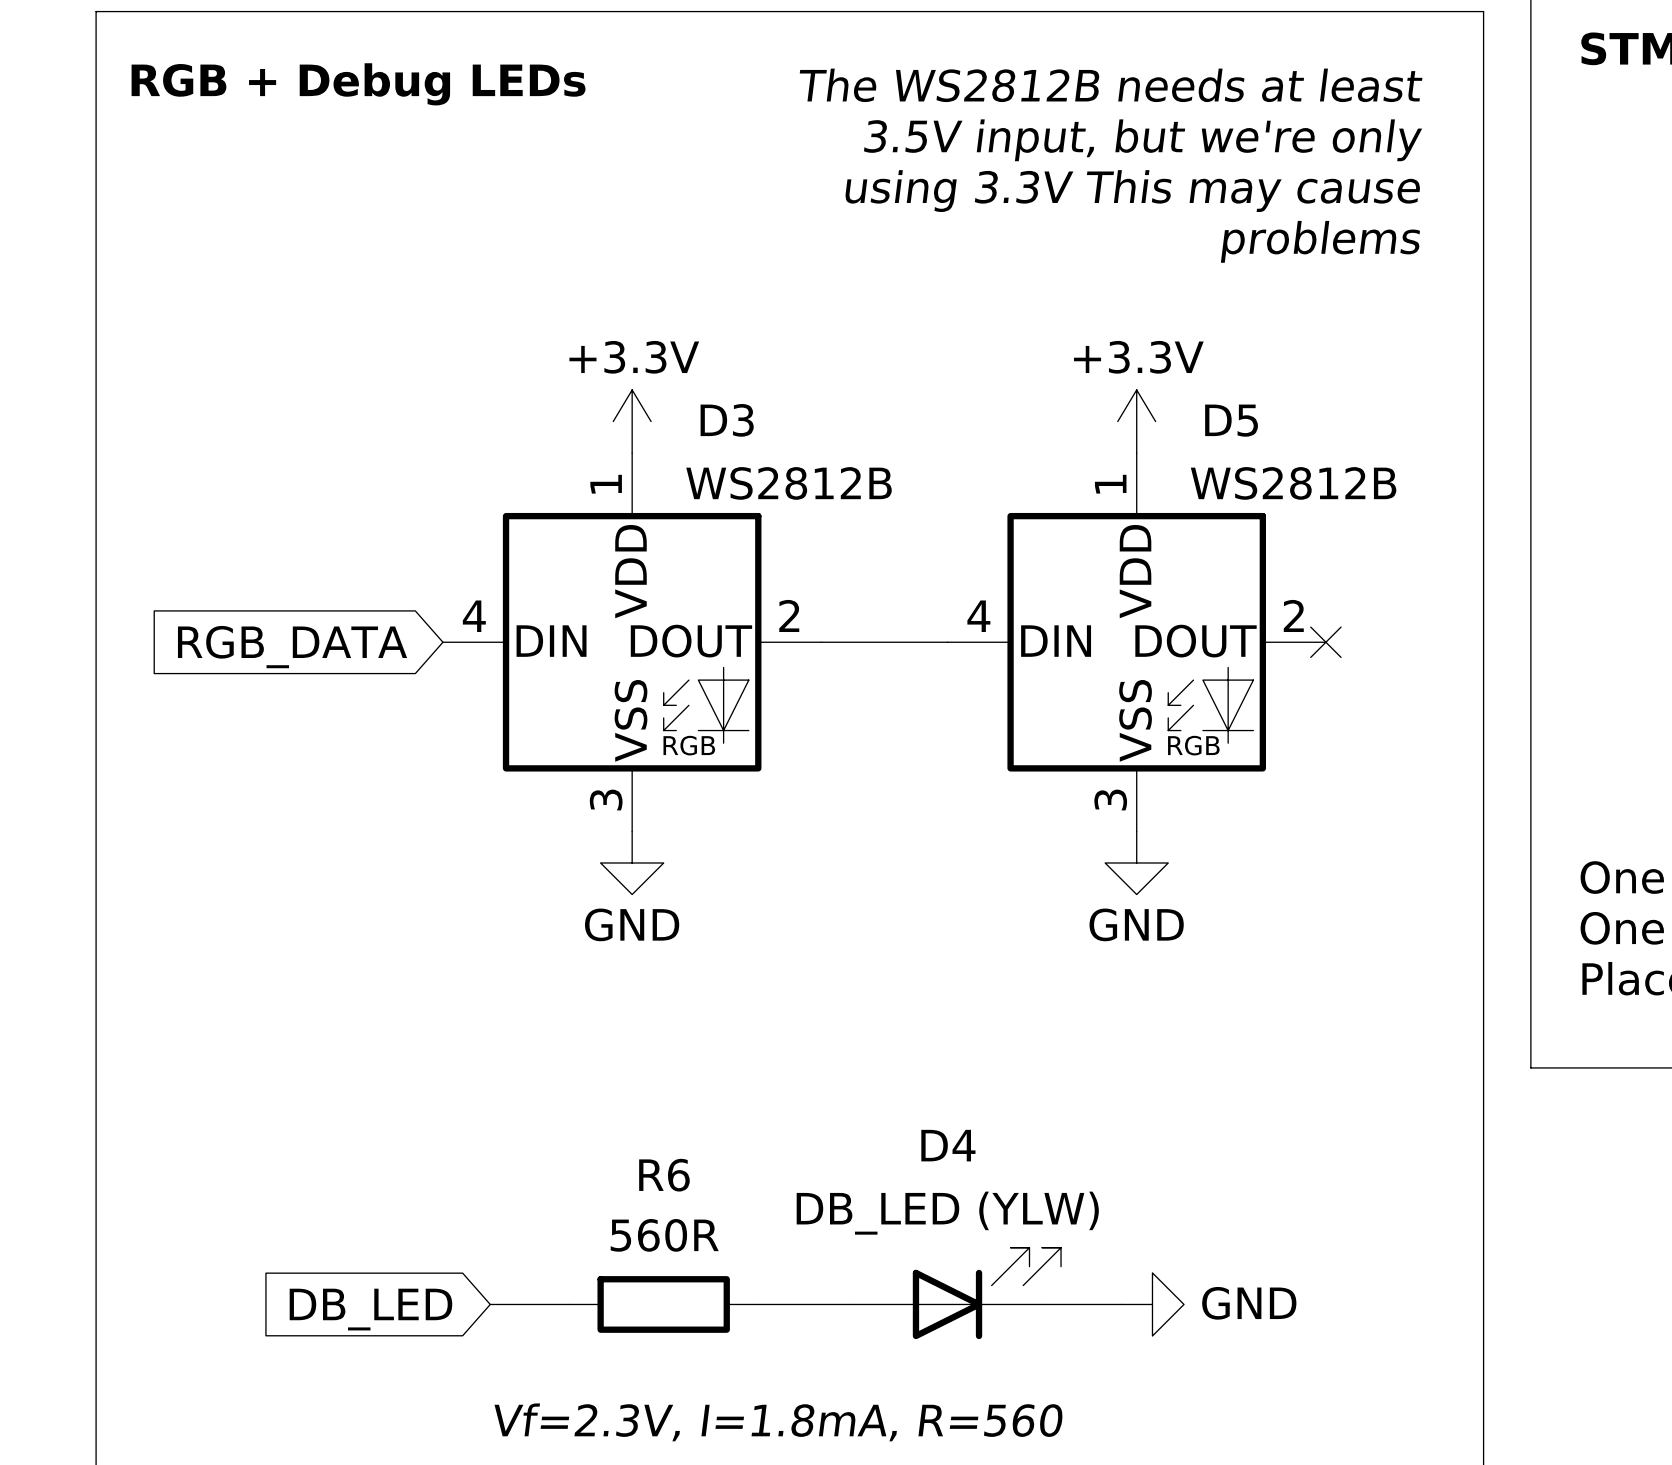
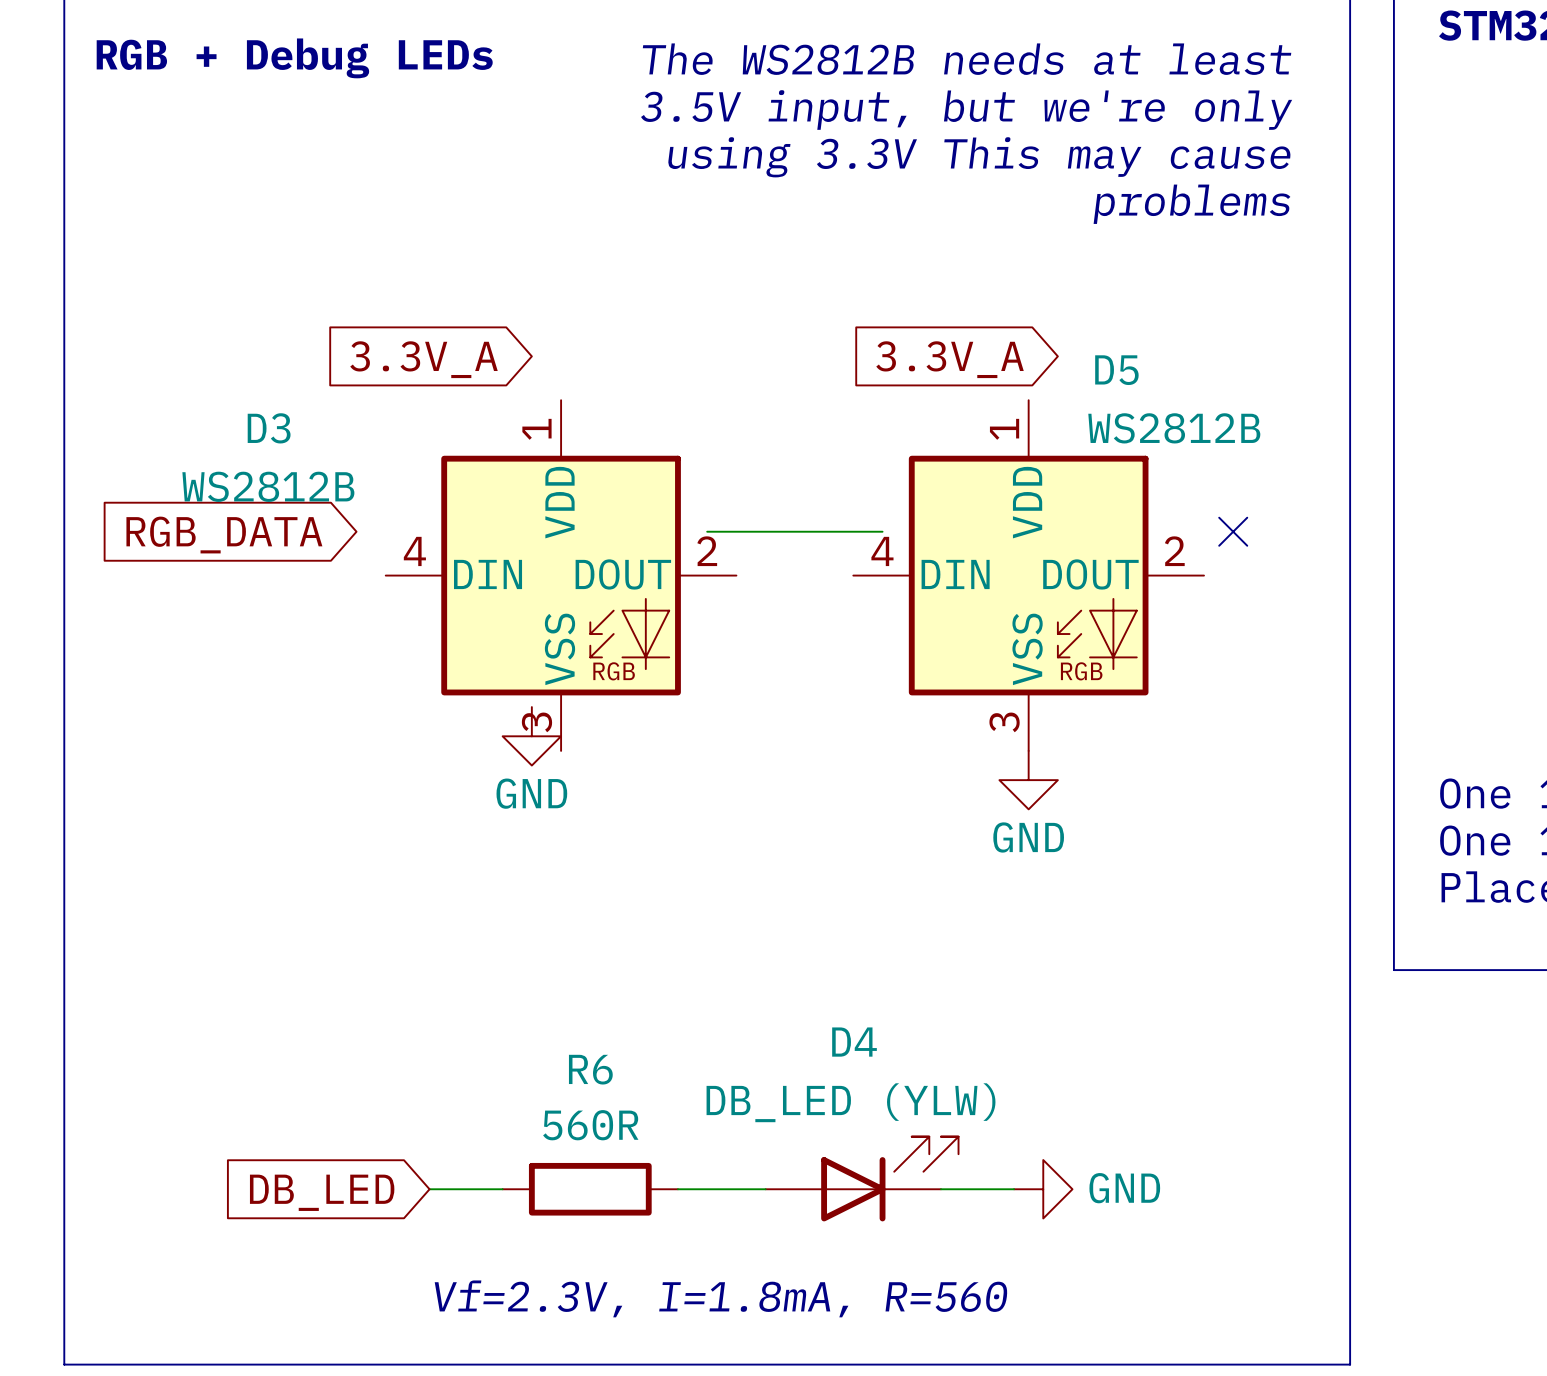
global label: none -> 3.3V_A (423, 359)
global label: none -> 3.3V_A (950, 359)
D3 name position: D3 (727, 420) -> D3 (269, 428)
power symbol: +3.3V (632, 421) -> none
power symbol: +3.3V (1136, 421) -> none
D3 value position: WS2812B (789, 483) -> WS2812B (268, 486)
wire: none -> (707, 531) (882, 531)
wire: (821, 642) (947, 642) -> none
no-connect mark position: (1325, 642) -> (1233, 531)
global label position: RGB_DATA (292, 647) -> RGB_DATA (224, 535)
power symbol position: GND (632, 862) -> GND (531, 736)

